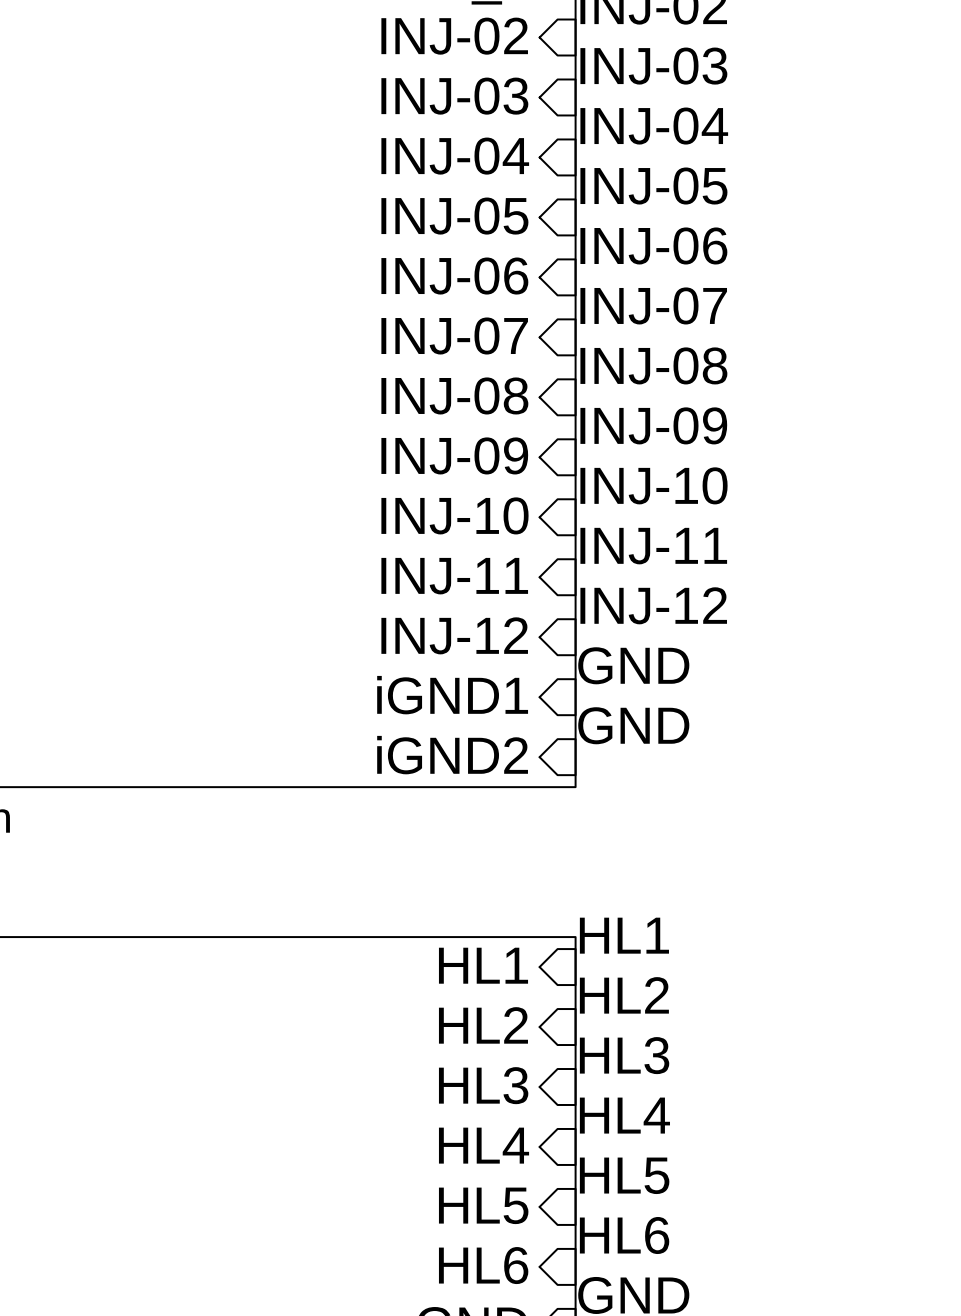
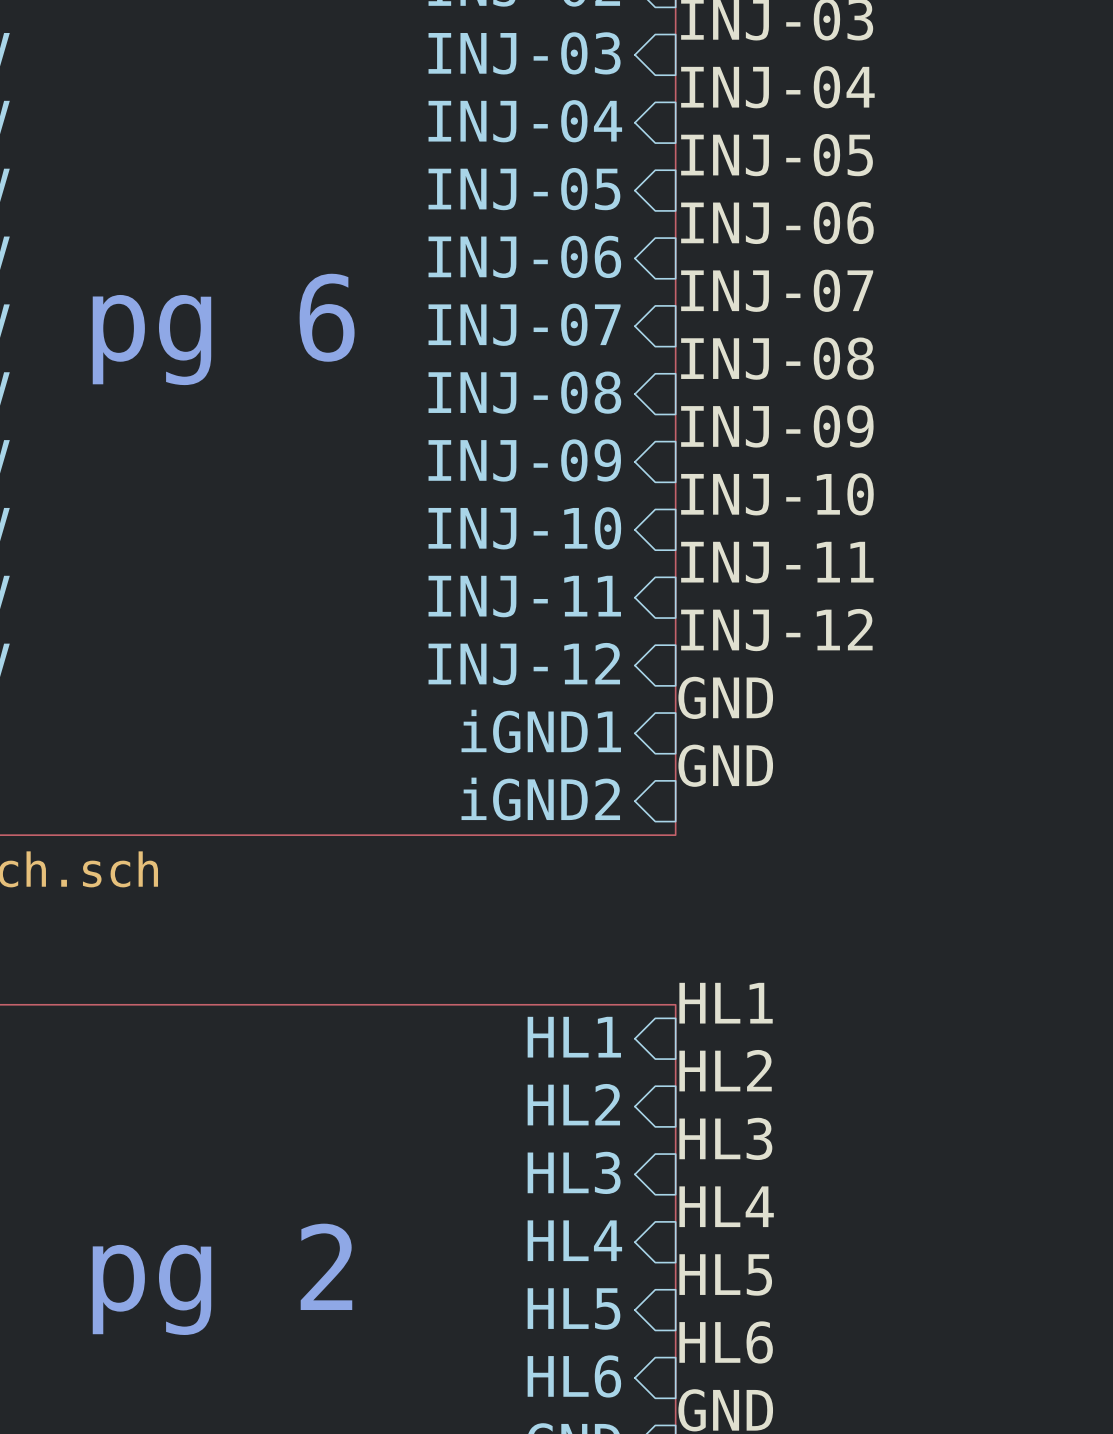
text: none -> pg 6 (223, 329)
text: none -> pg 2 (222, 1279)

